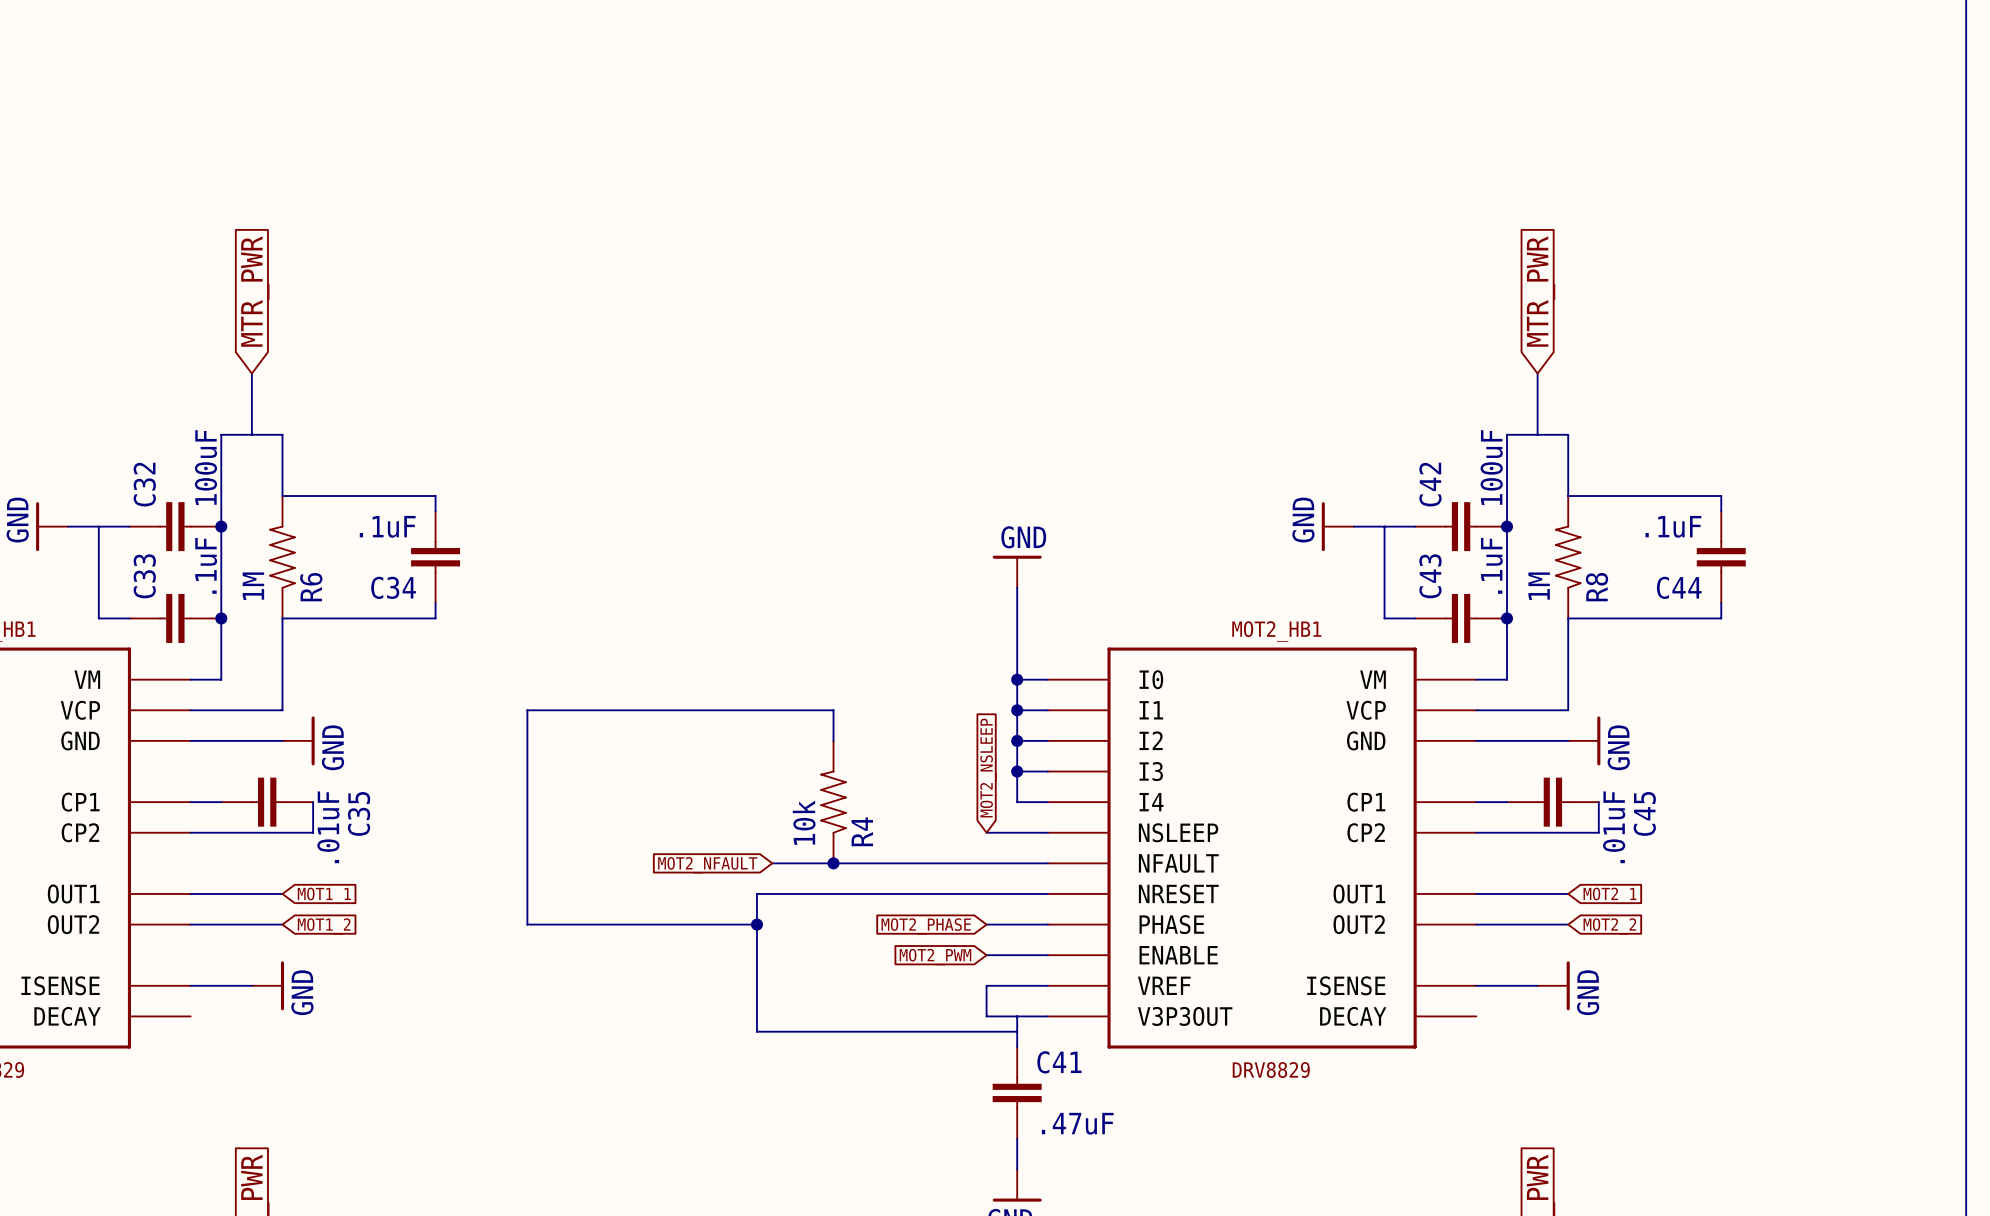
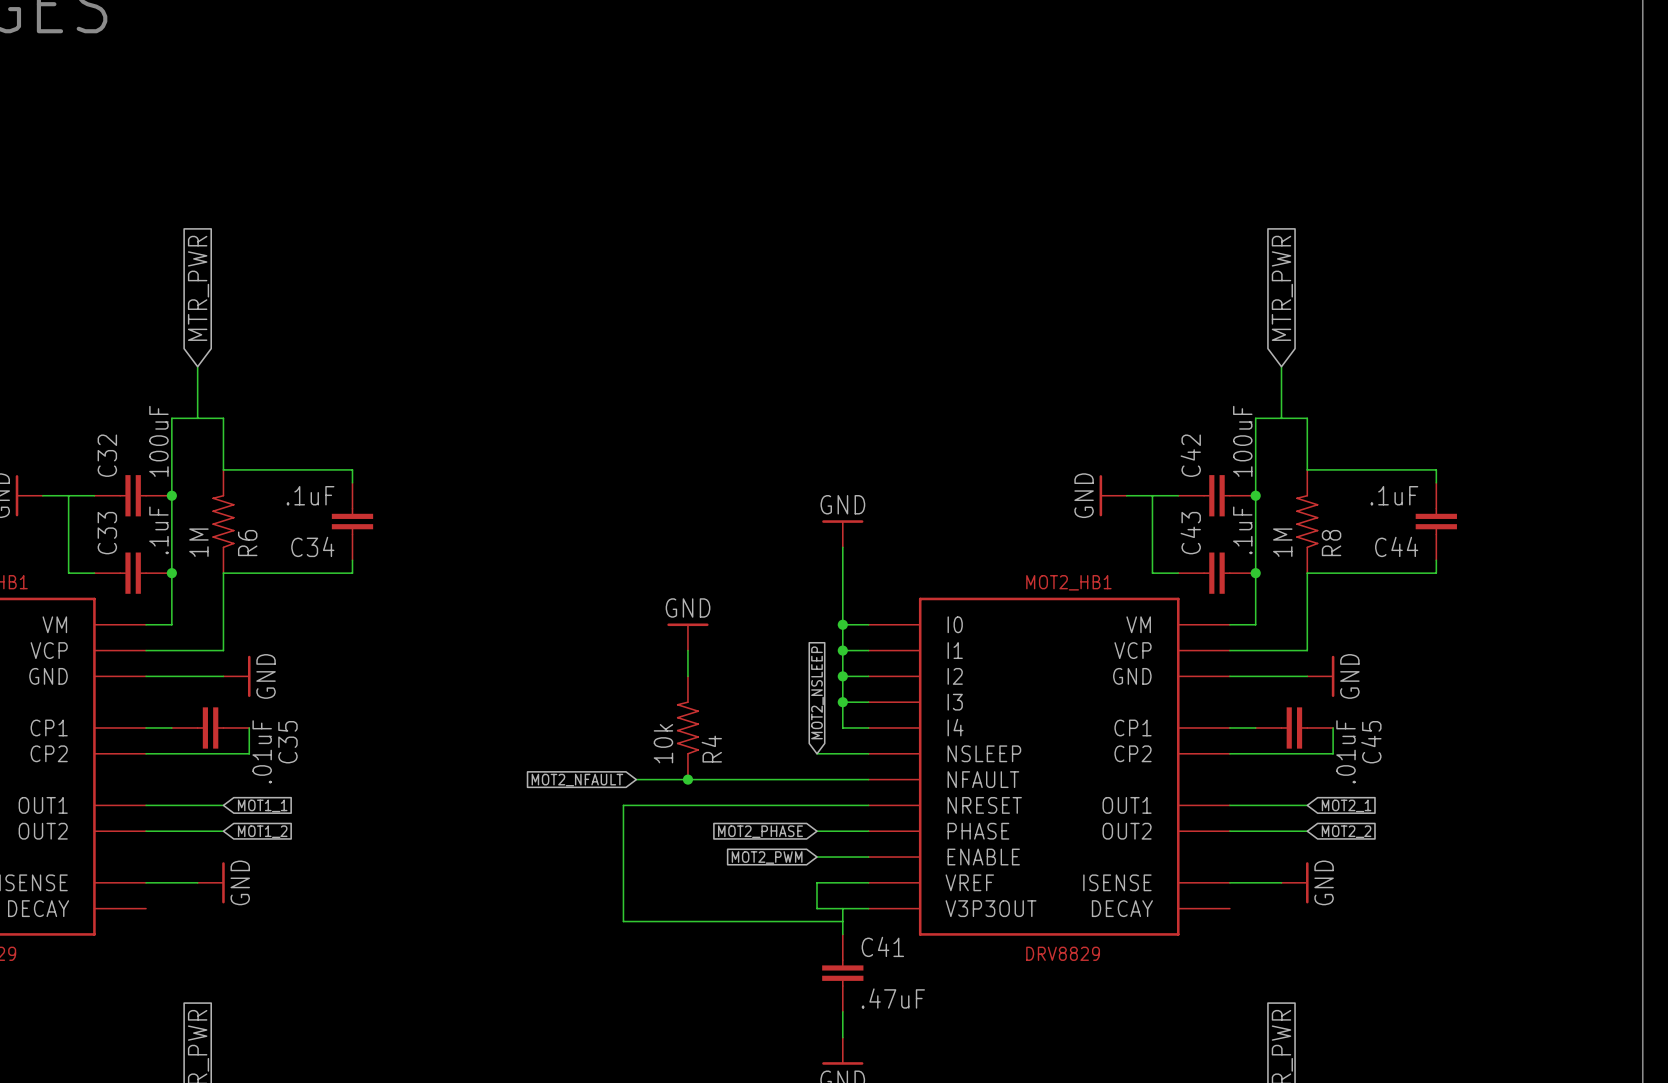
power symbol: none -> GND (687, 637)
wire: (833, 710) (527, 710) (527, 924) (756, 924) -> none
junction: (756, 924) -> none

